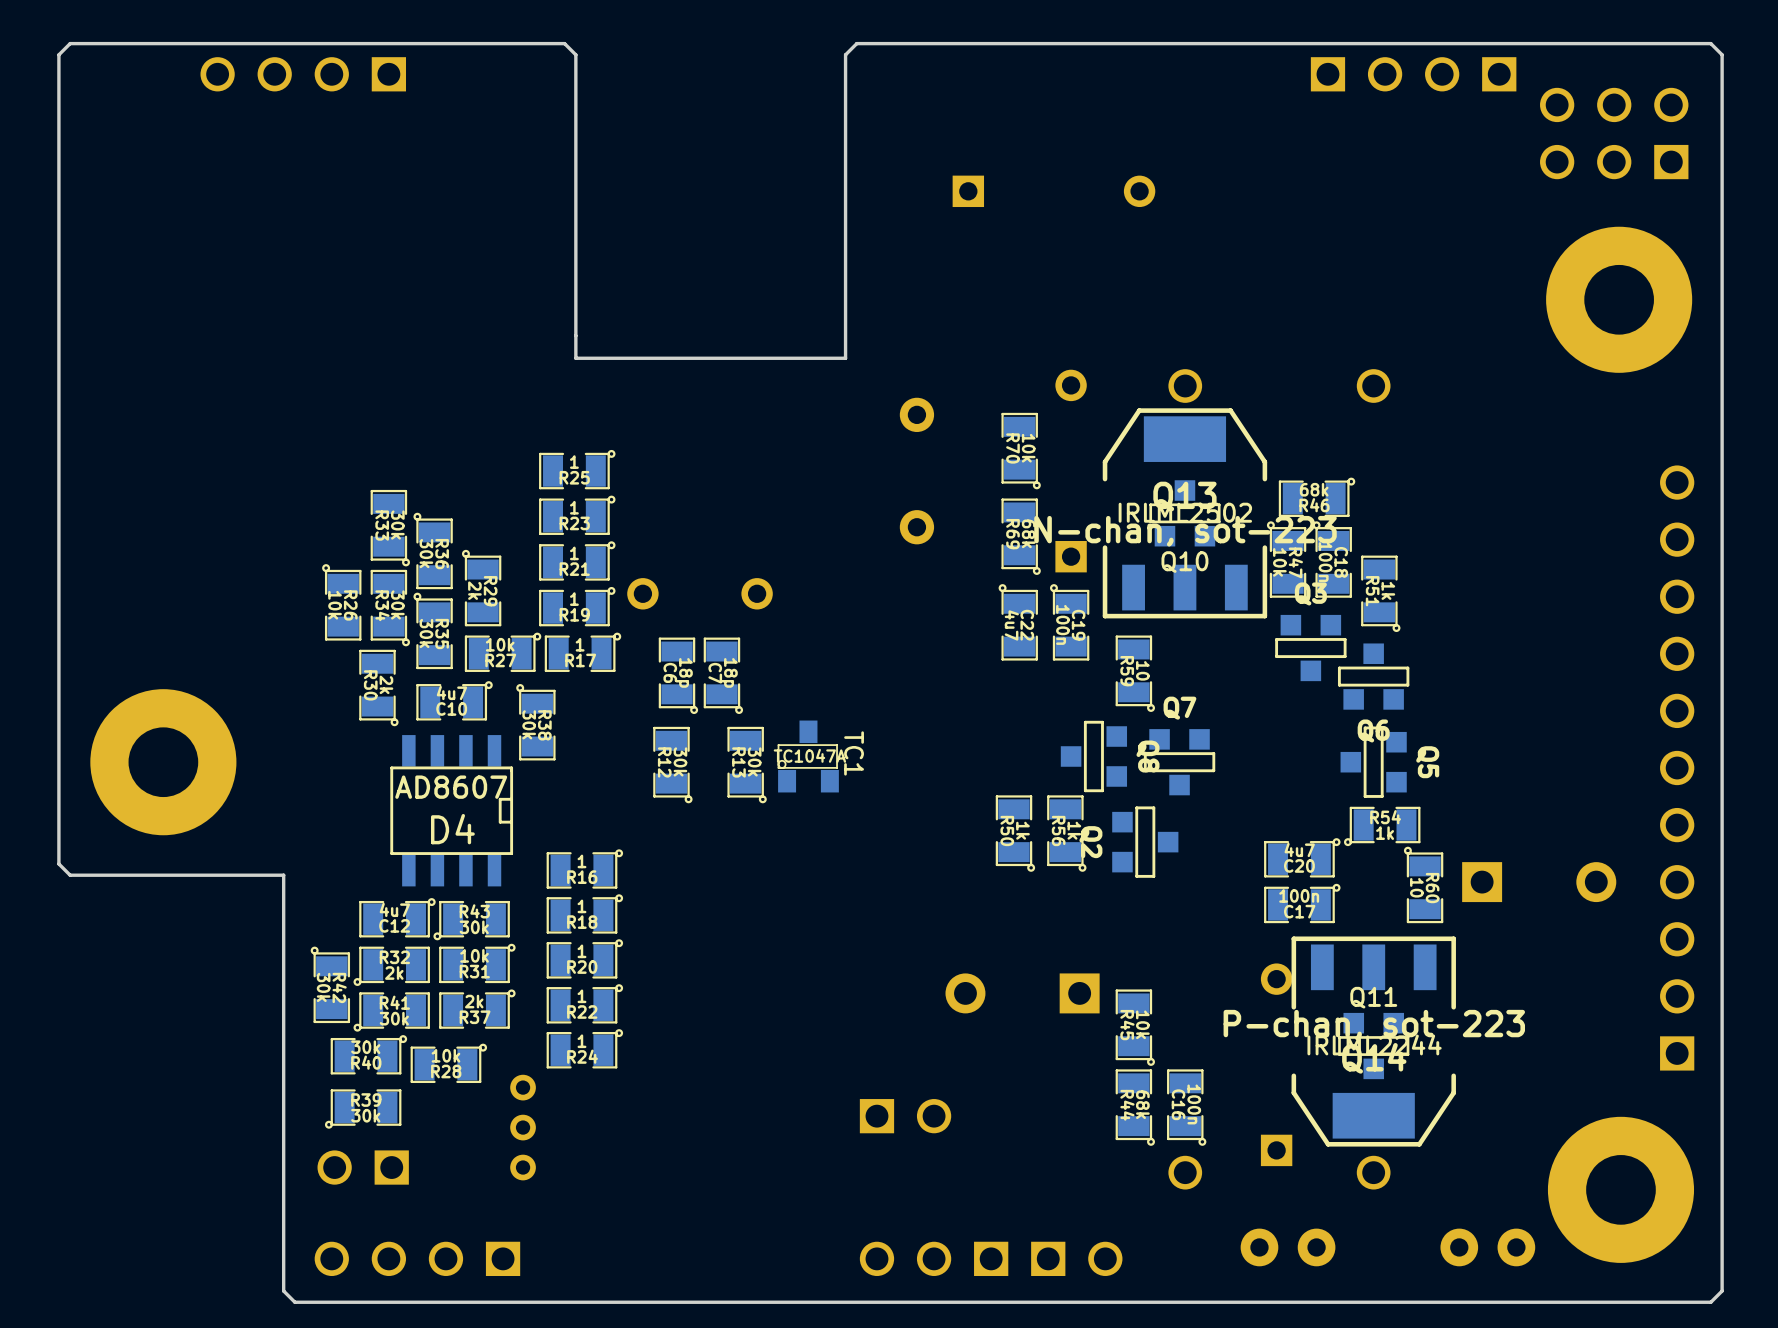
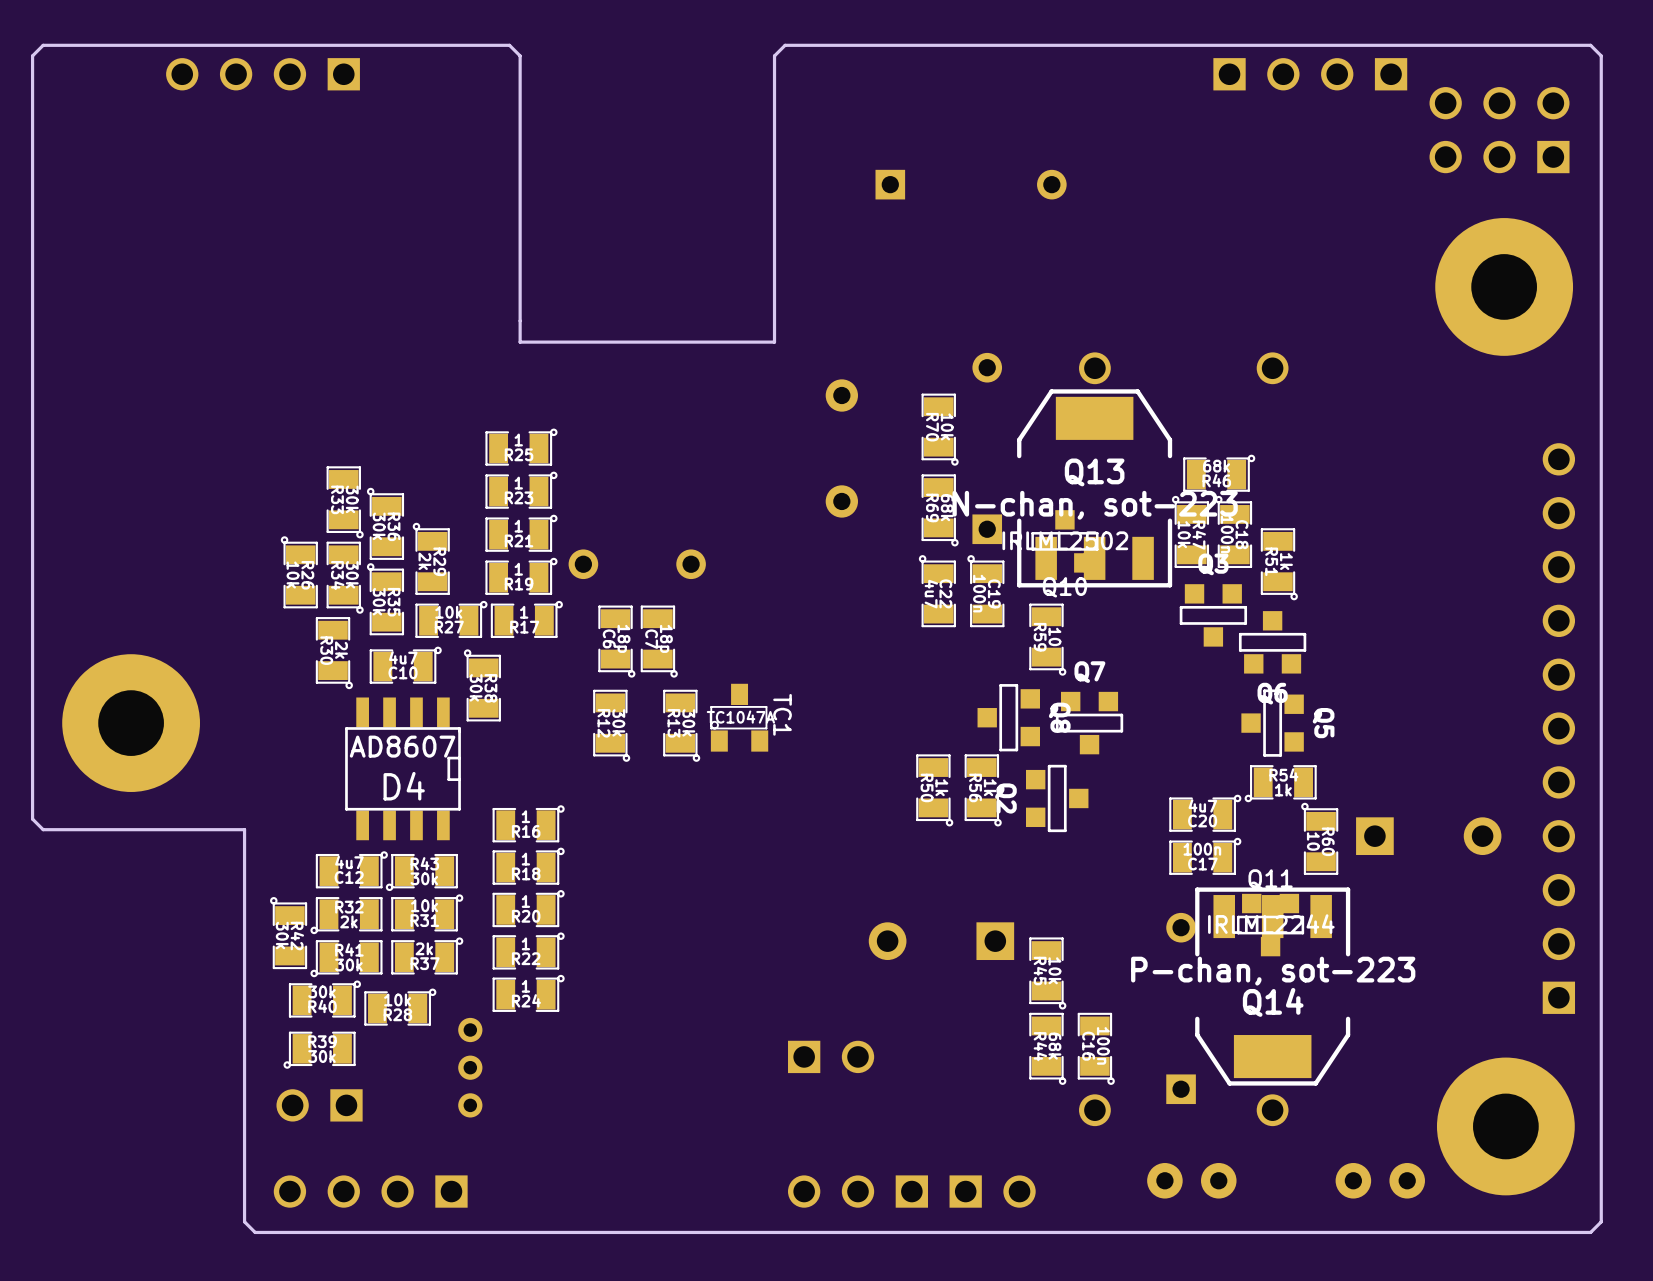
Q10 position: (1184, 513) -> (1064, 541)
Q11 position: (1373, 1046) -> (1270, 925)

